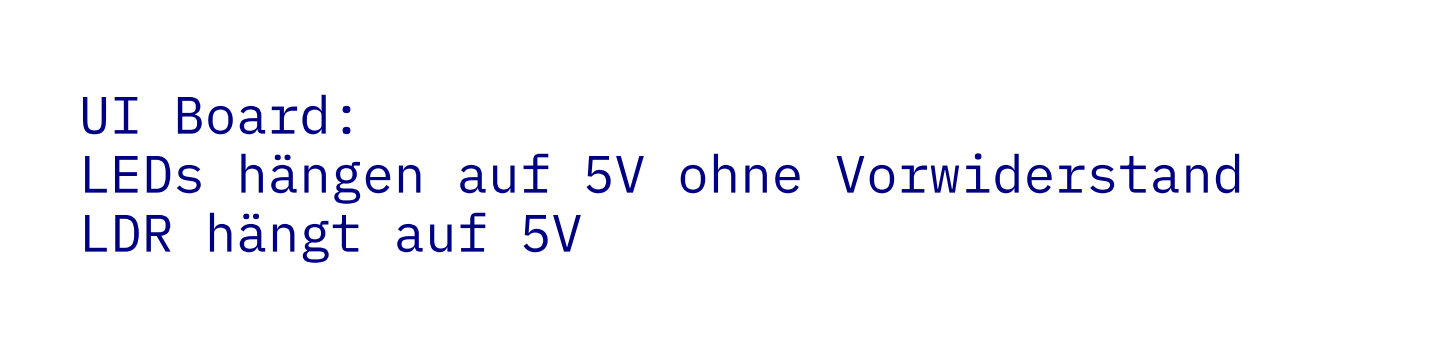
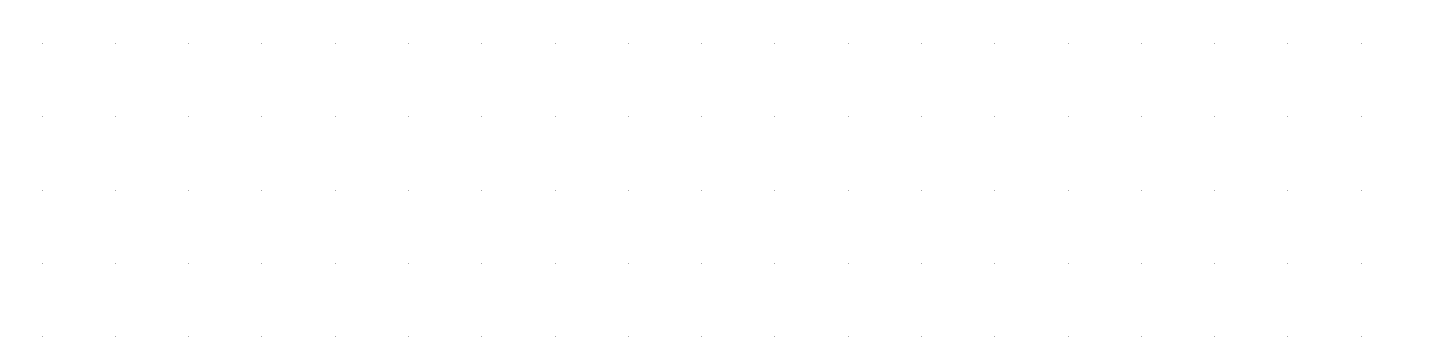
text: UI Board: (216, 114) -> none
text: LEDs hängen auf 5V ohne Vorwiderstand (662, 178) -> none
text: LDR hängt auf 5V (332, 237) -> none

